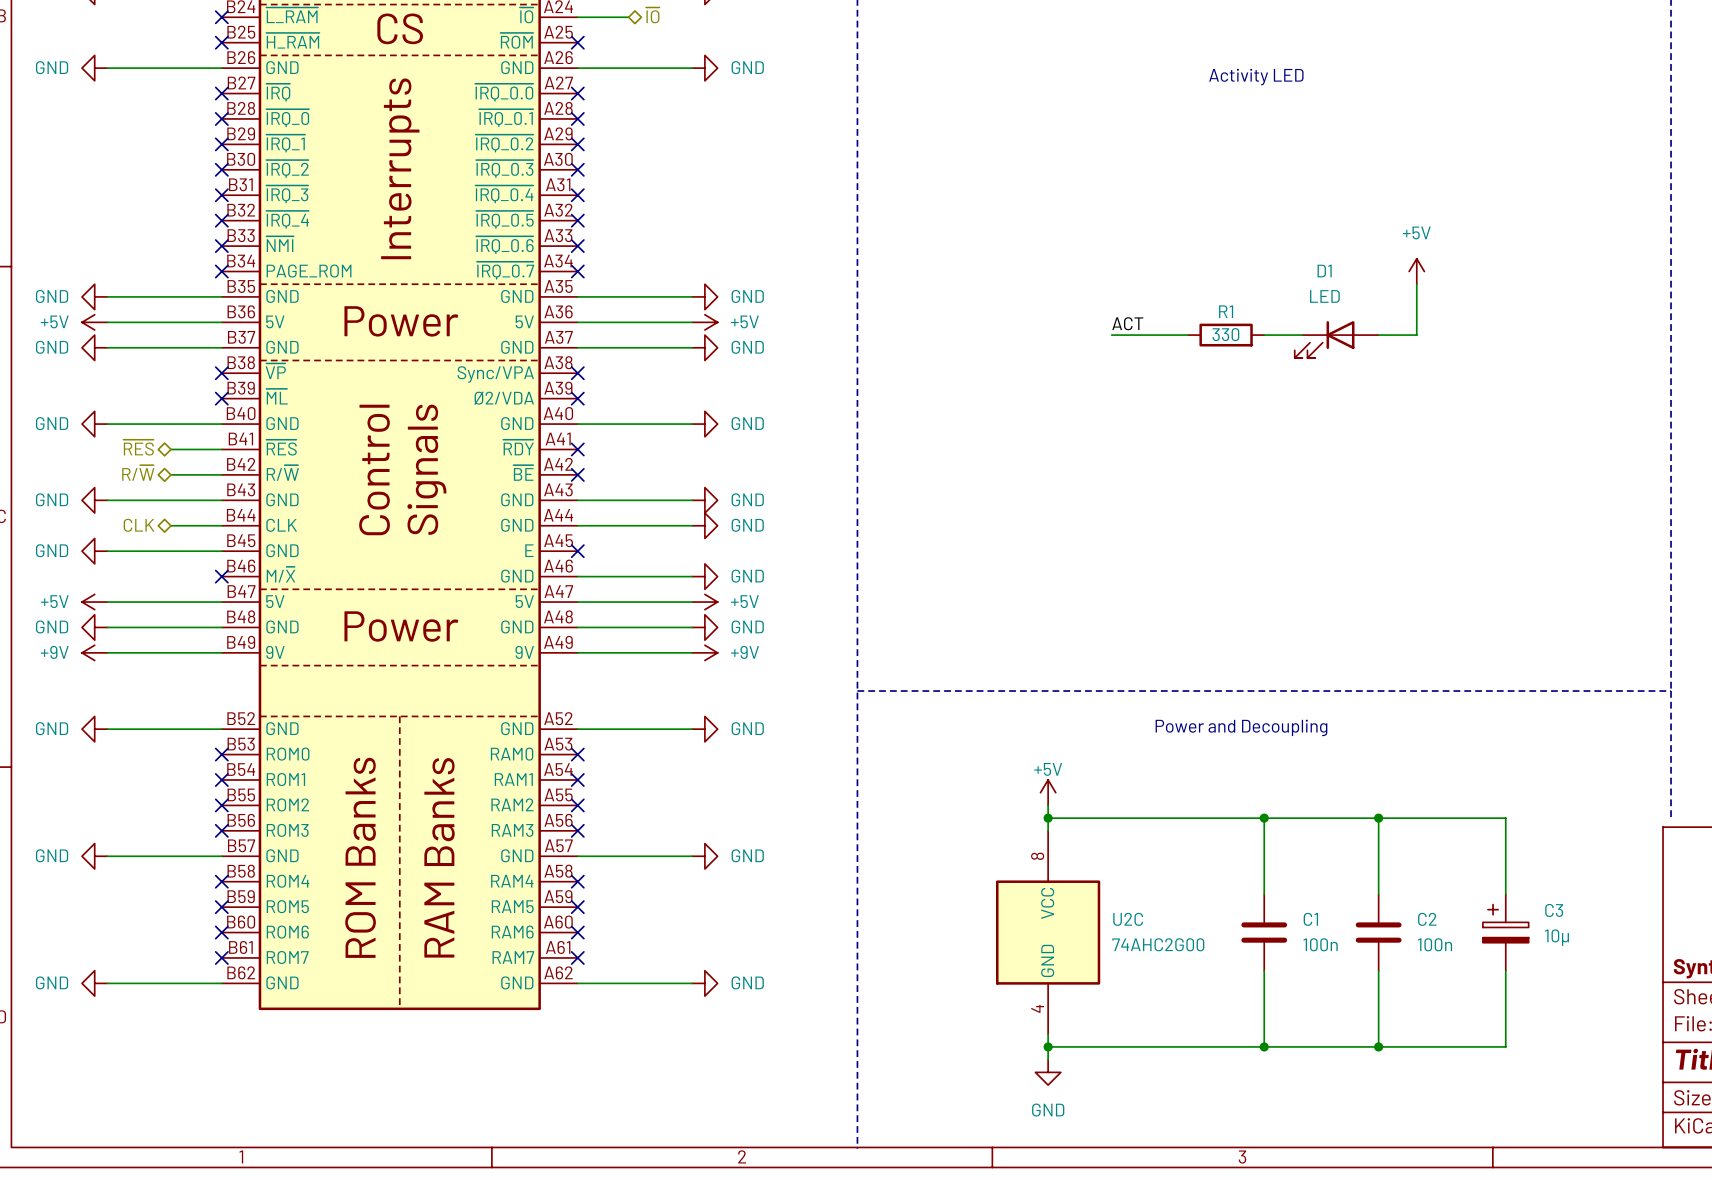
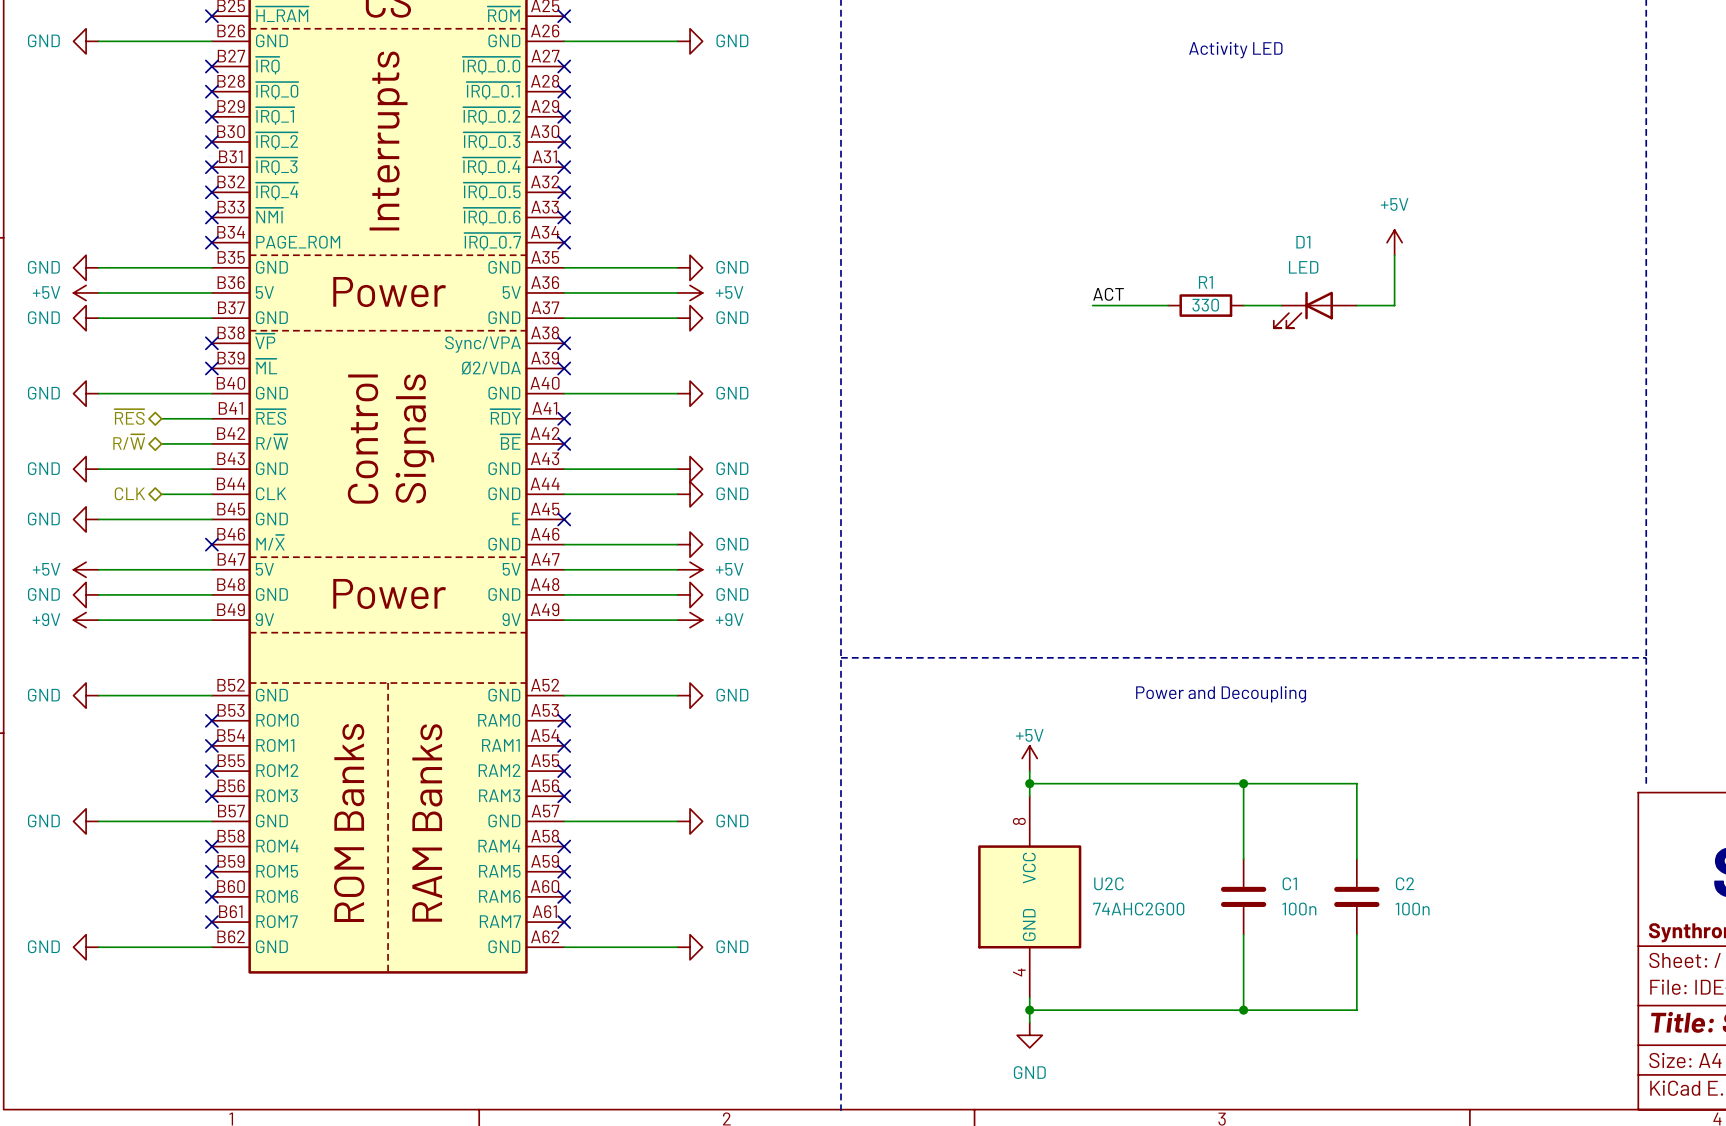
wire: (1378, 818) (1505, 818) (1505, 894) -> none
junction: (1378, 818) -> none
C3: 10µ (1505, 932) -> none
wire: (1505, 970) (1505, 1046) (1378, 1046) -> none
junction: (1378, 1046) -> none

